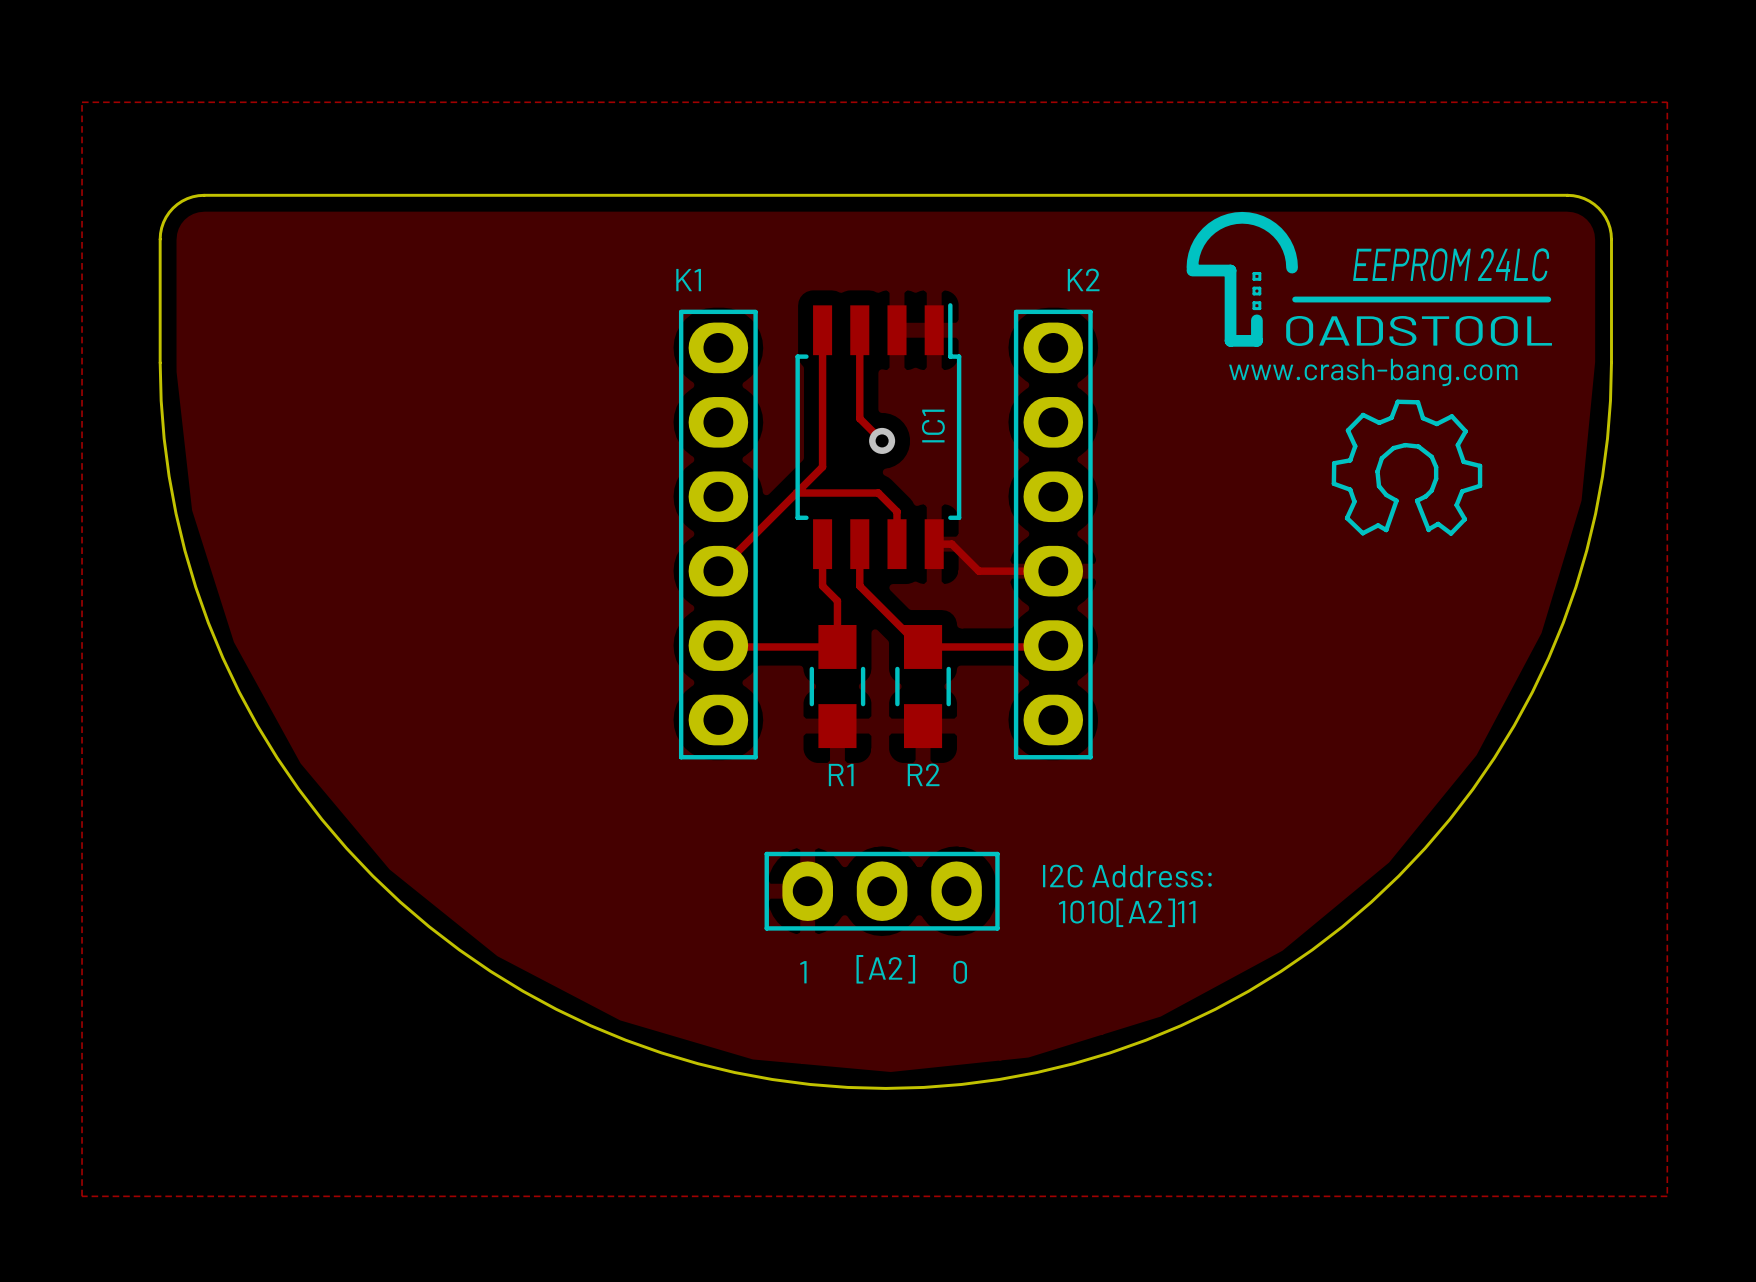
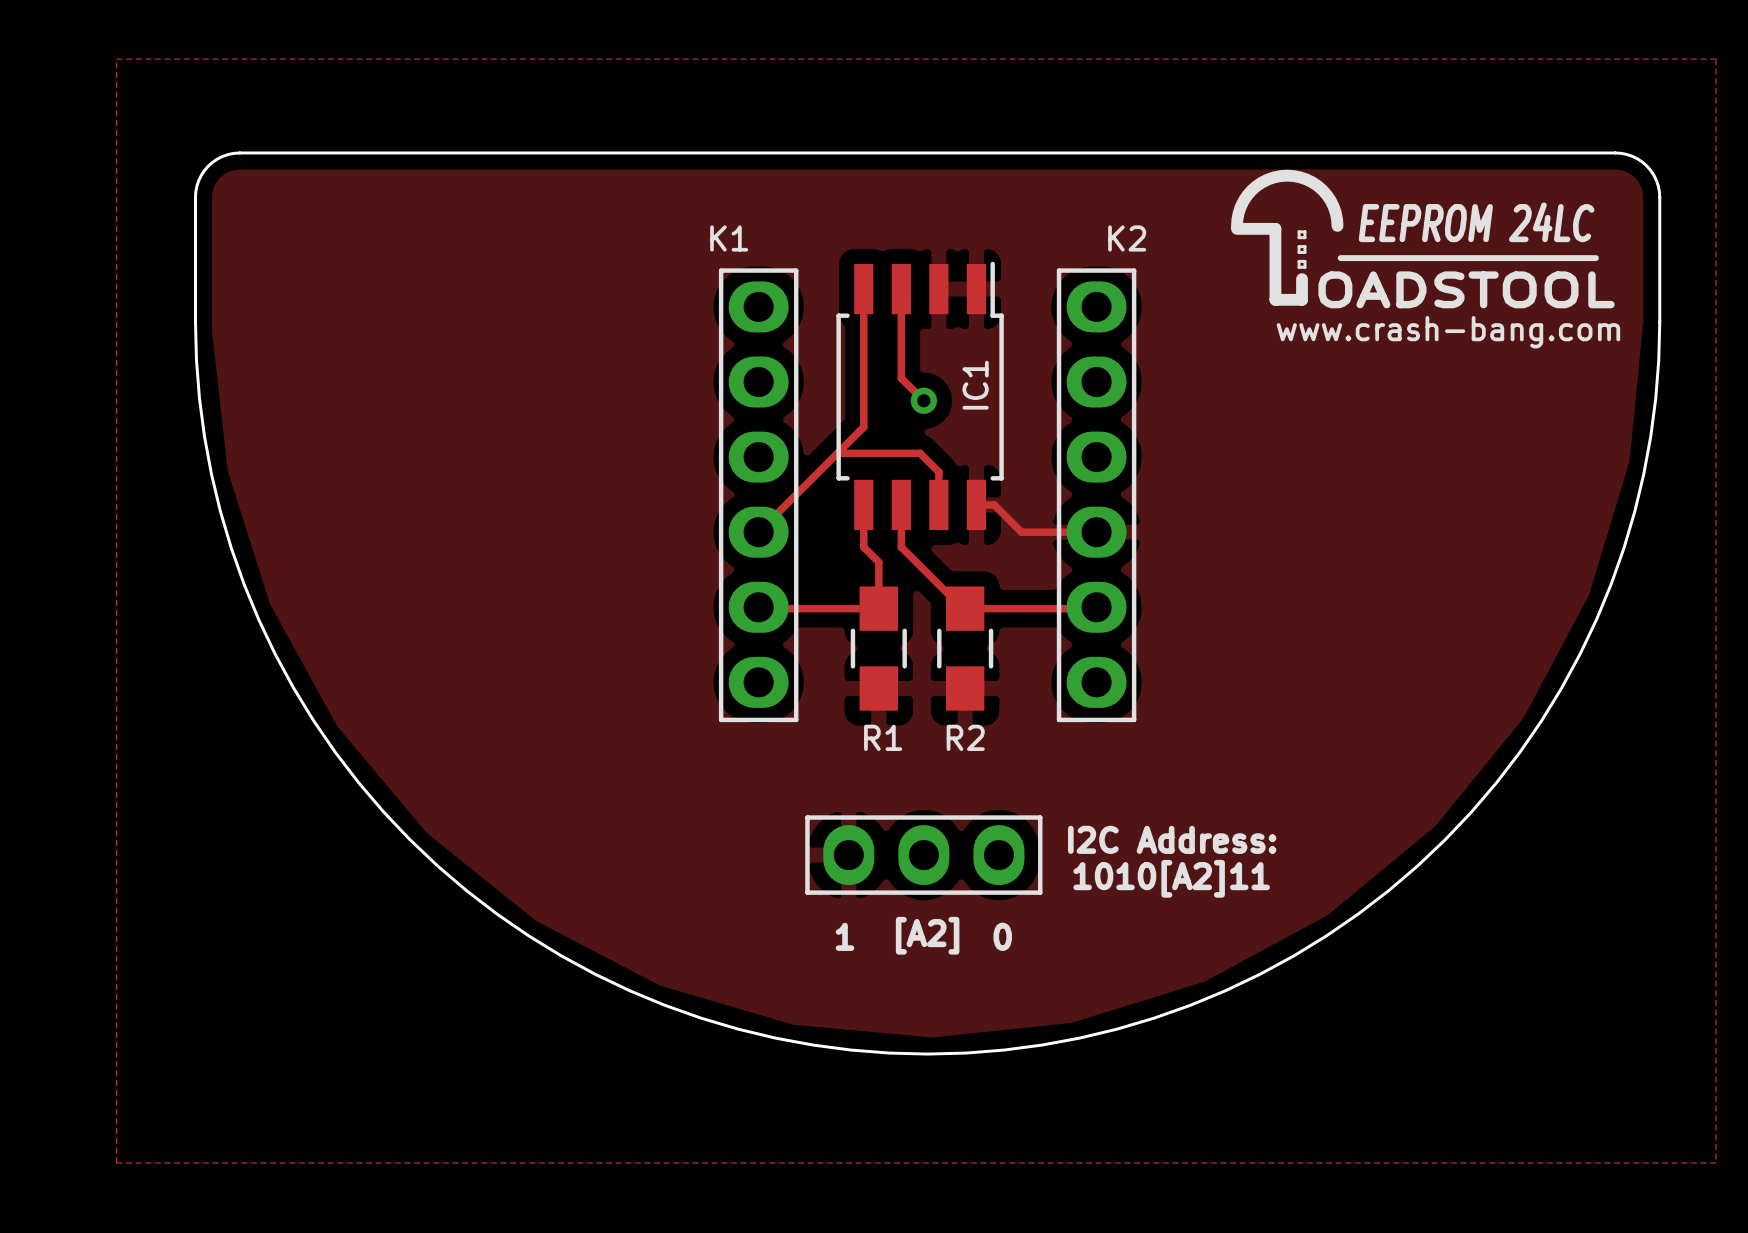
drawing: [1331, 399, 1483, 536] -> none

